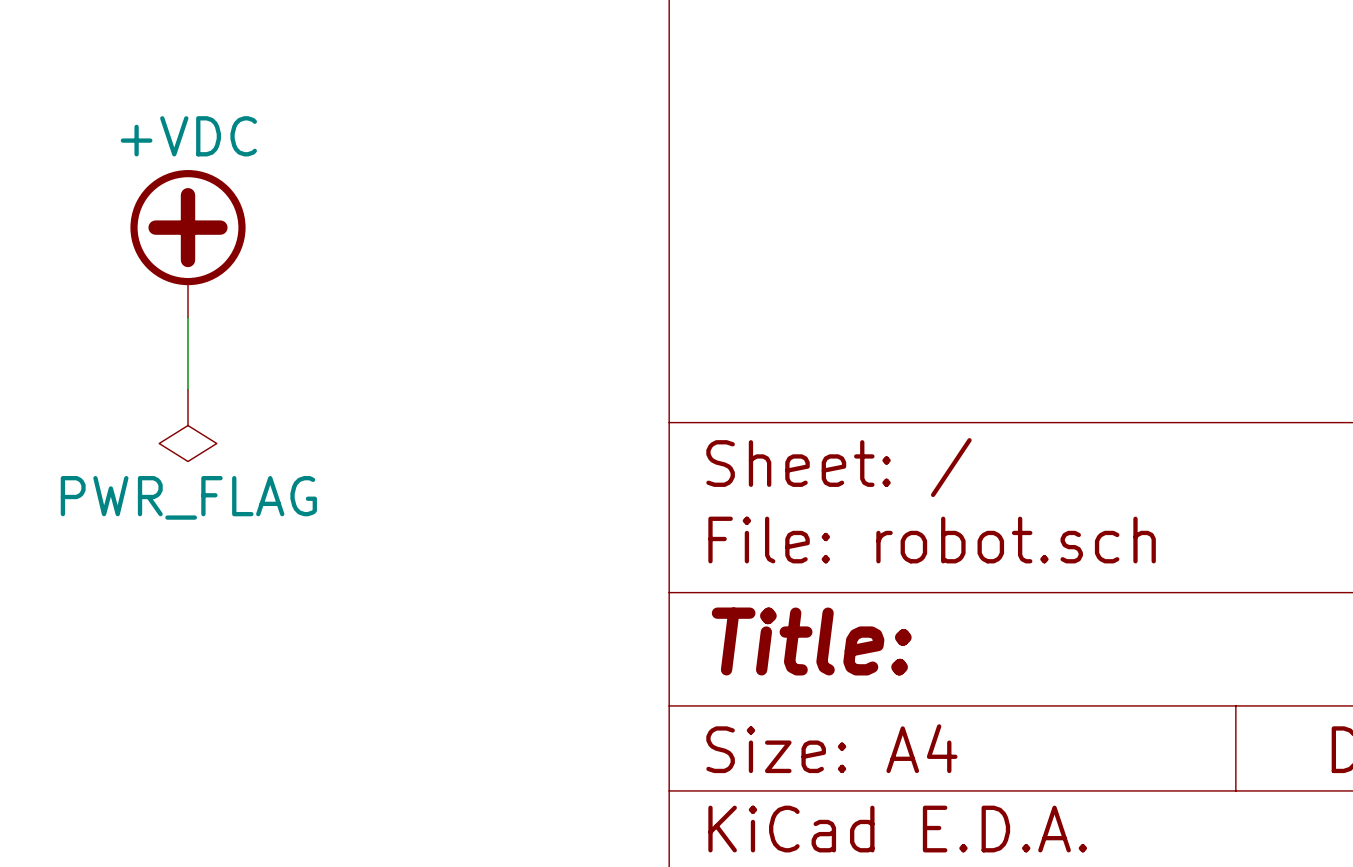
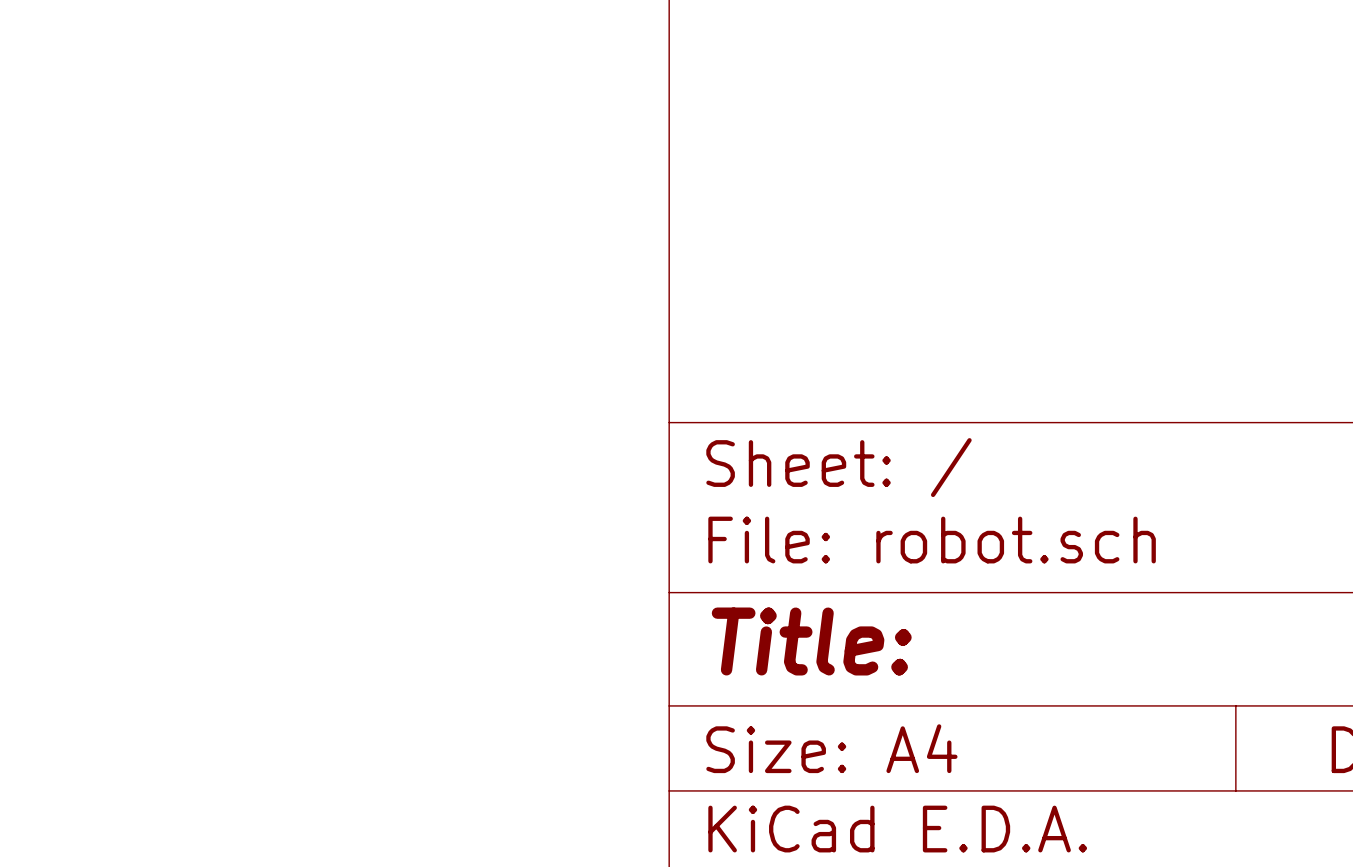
power symbol: +VDC (188, 243) -> none
wire: (188, 317) (188, 389) -> none
power symbol: PWR_FLAG (188, 425) -> none

